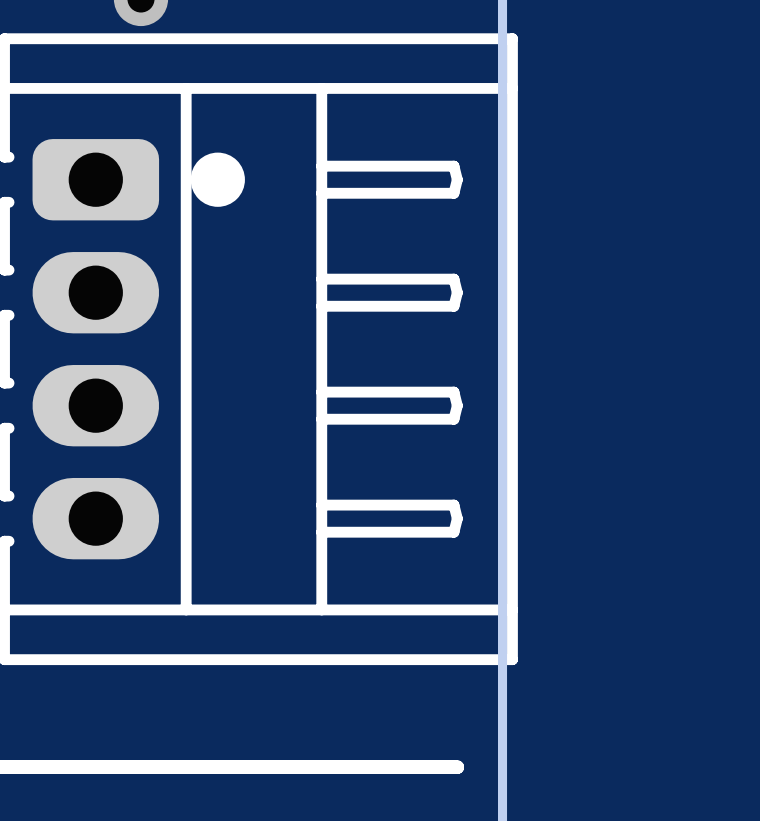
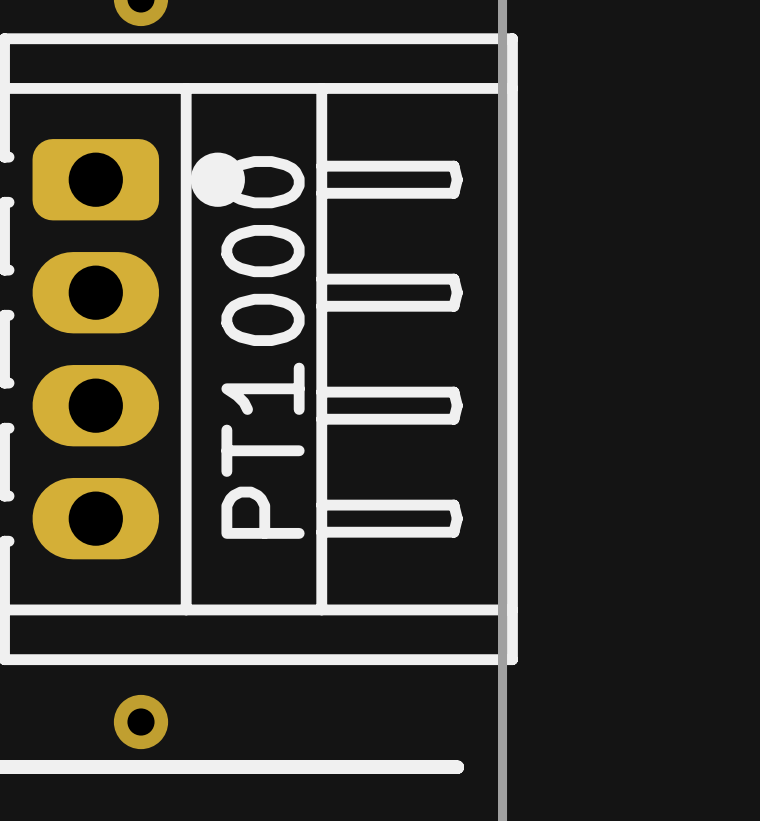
text: none -> PT1000 (263, 347)
via: none -> (140, 722)

